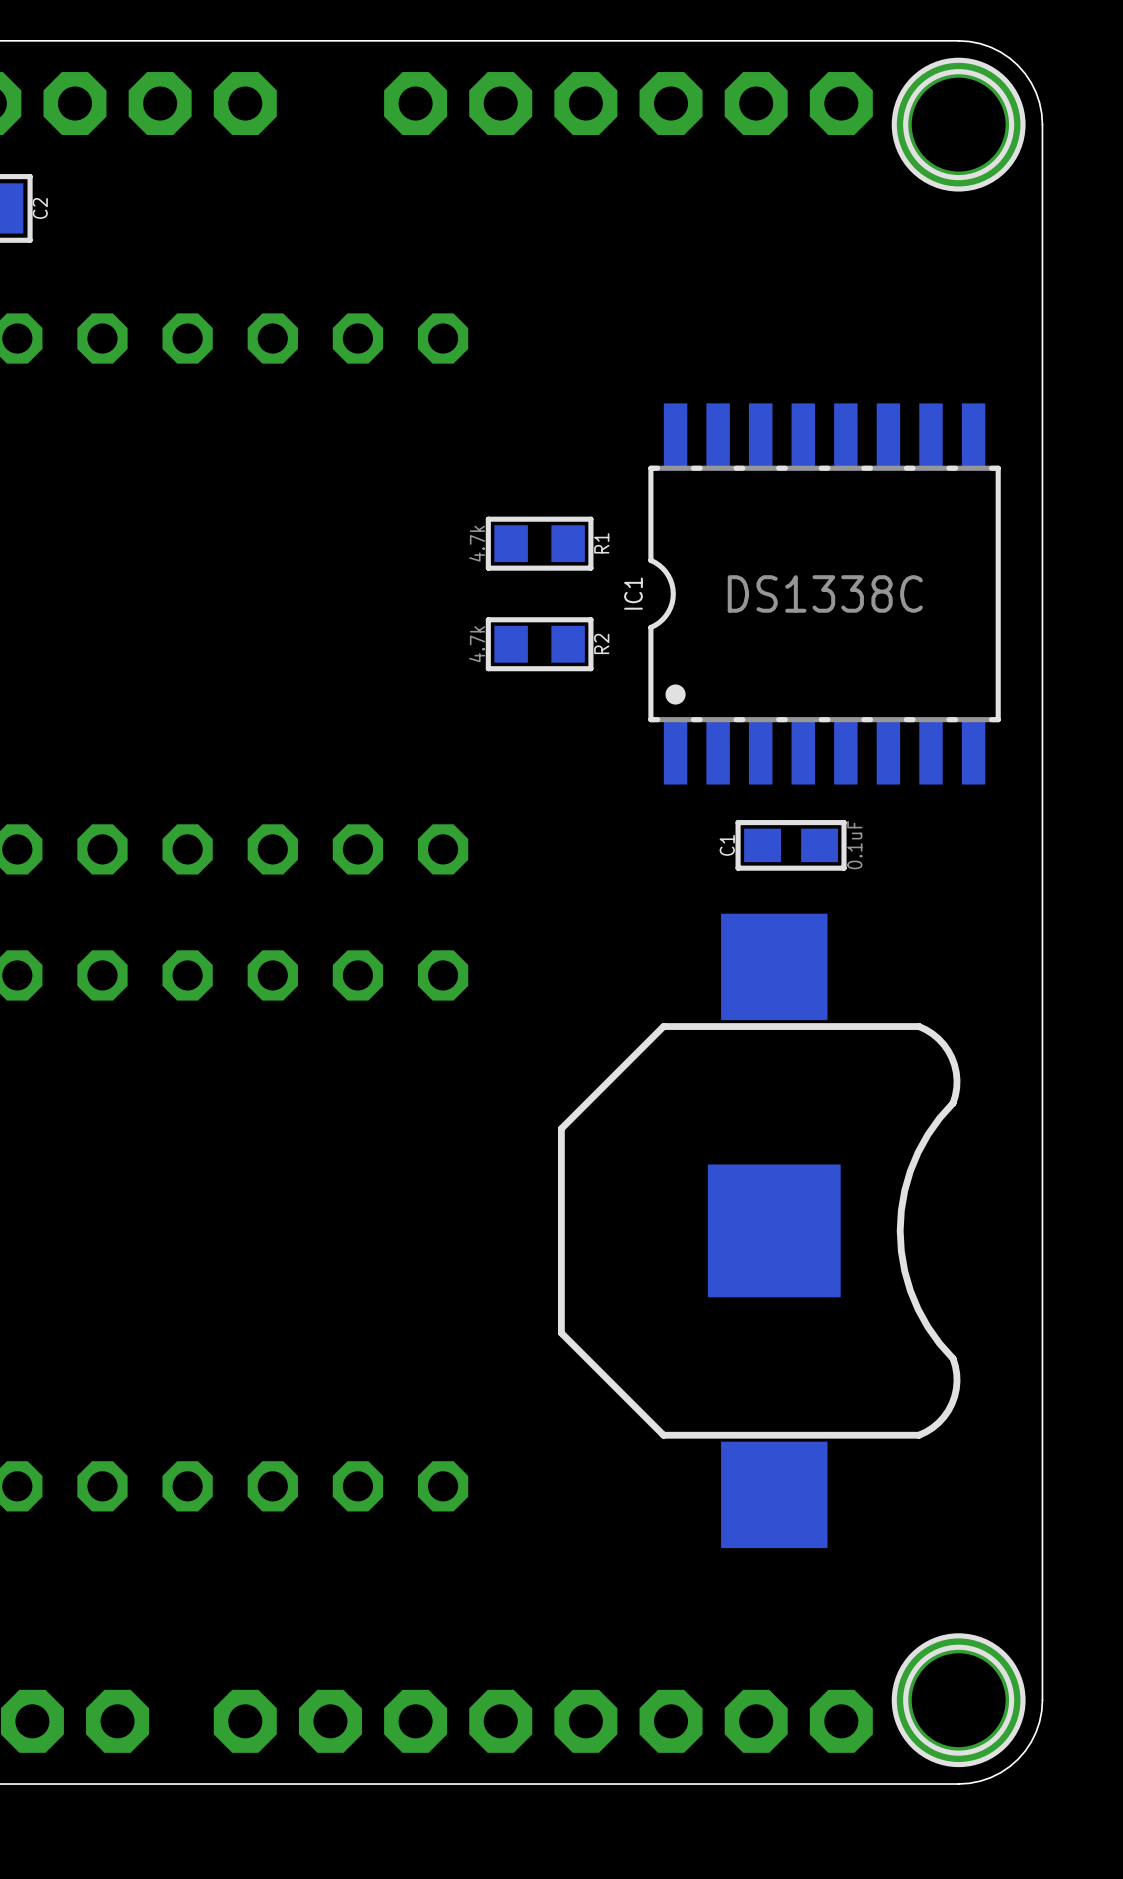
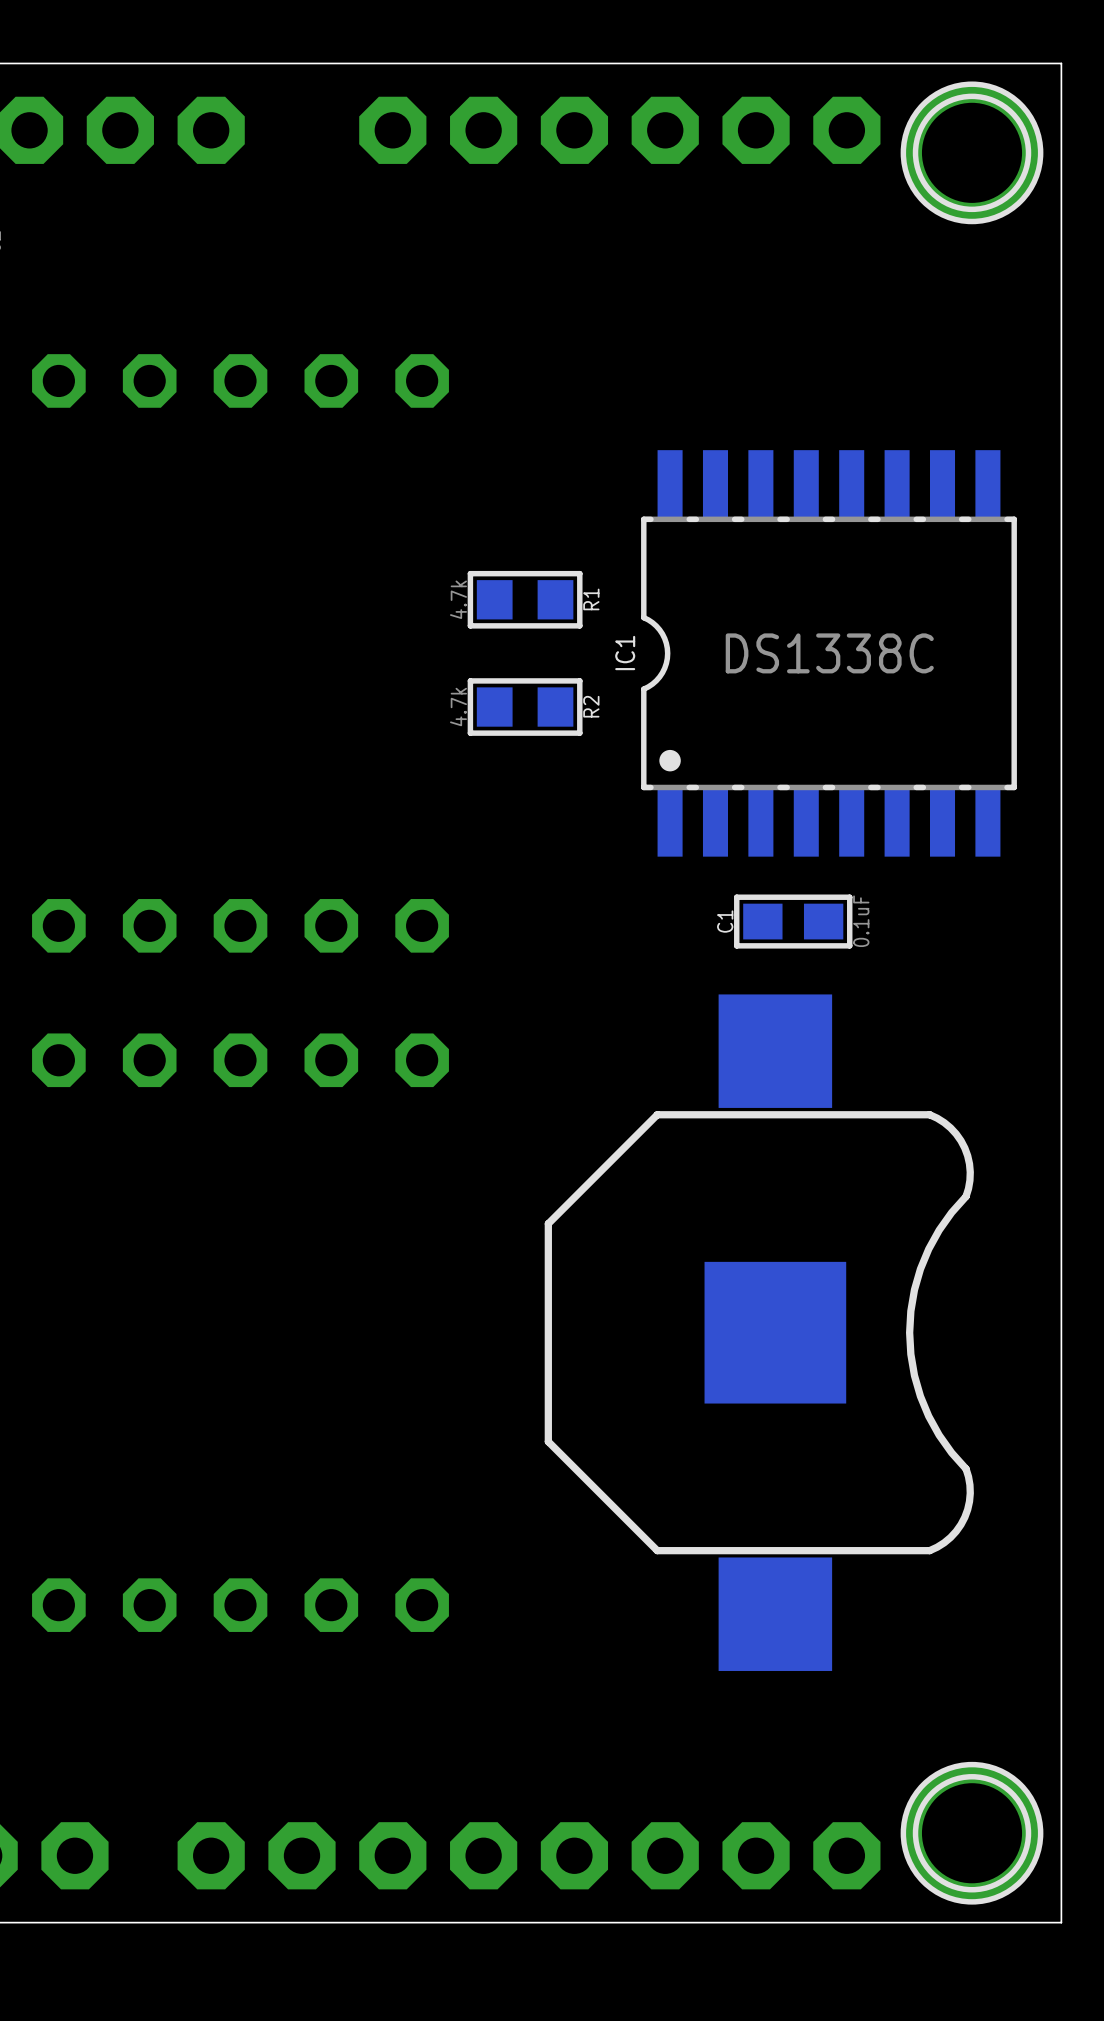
board edge: (958, 40) (990, 47) (1017, 65) (1036, 92) (1042, 124) -> (972, 63) (1061, 63) (1061, 152)
board edge: (1042, 1700) (1036, 1732) (1017, 1759) (990, 1777) (958, 1784) -> (1061, 1833) (1061, 1922) (972, 1922)

